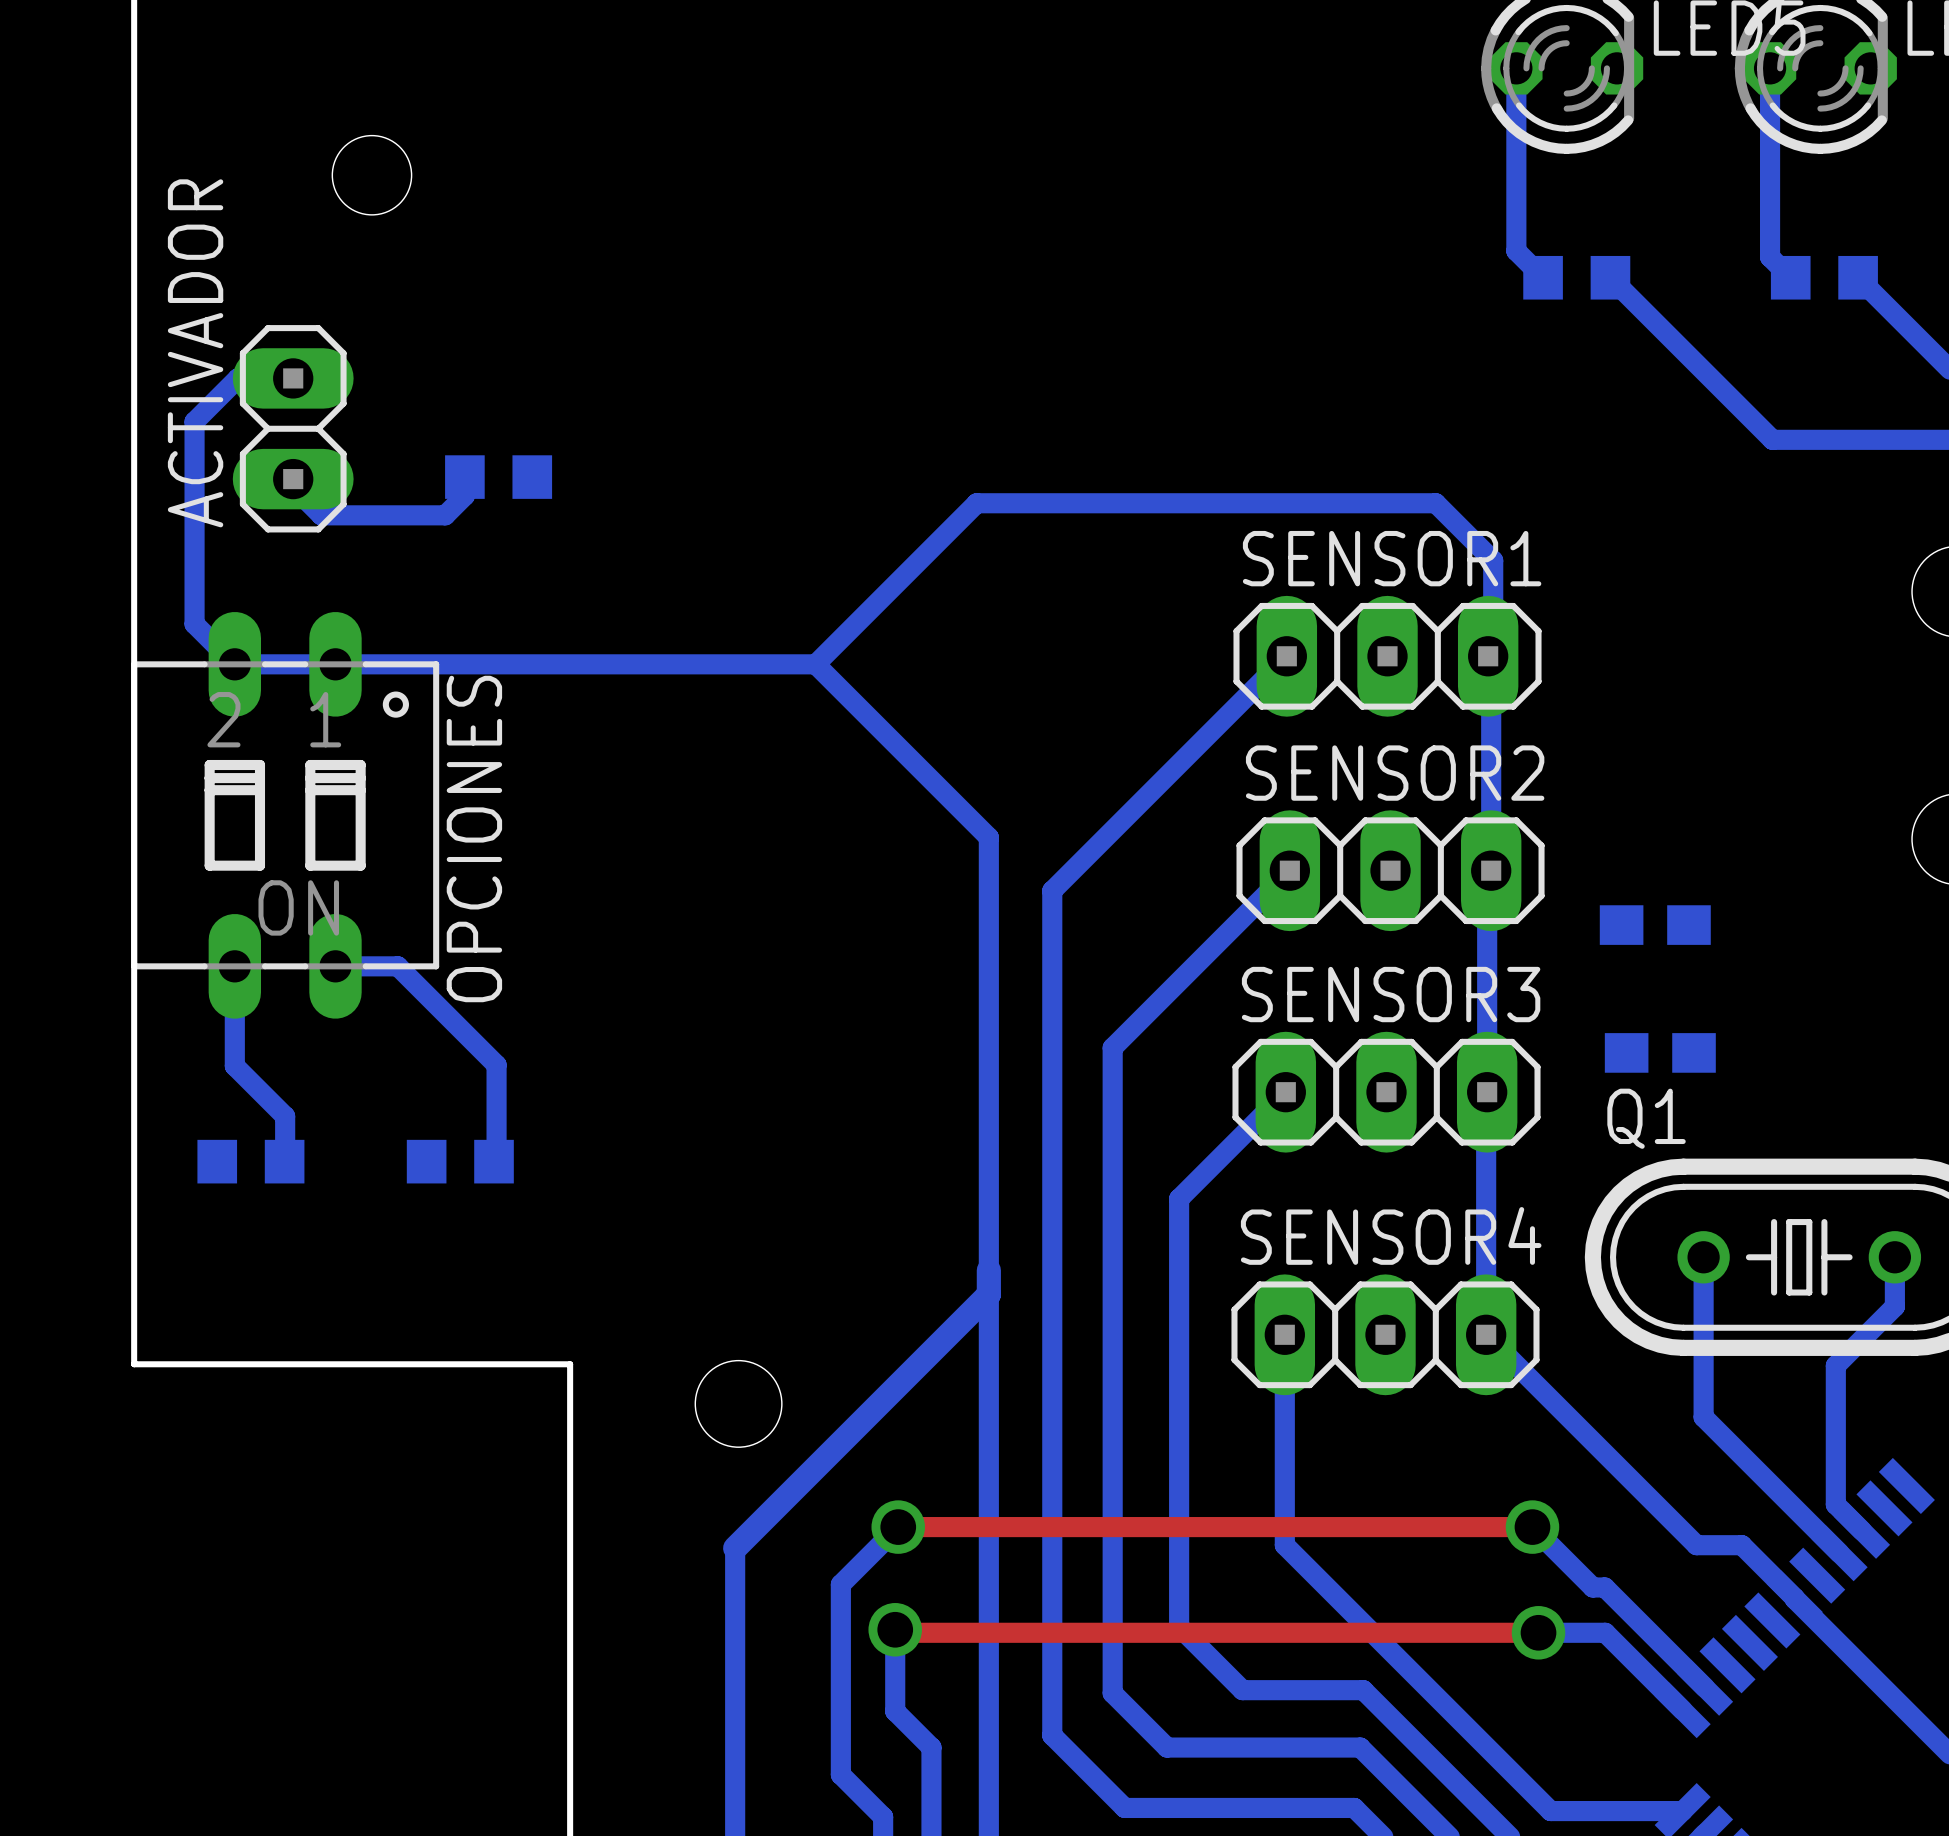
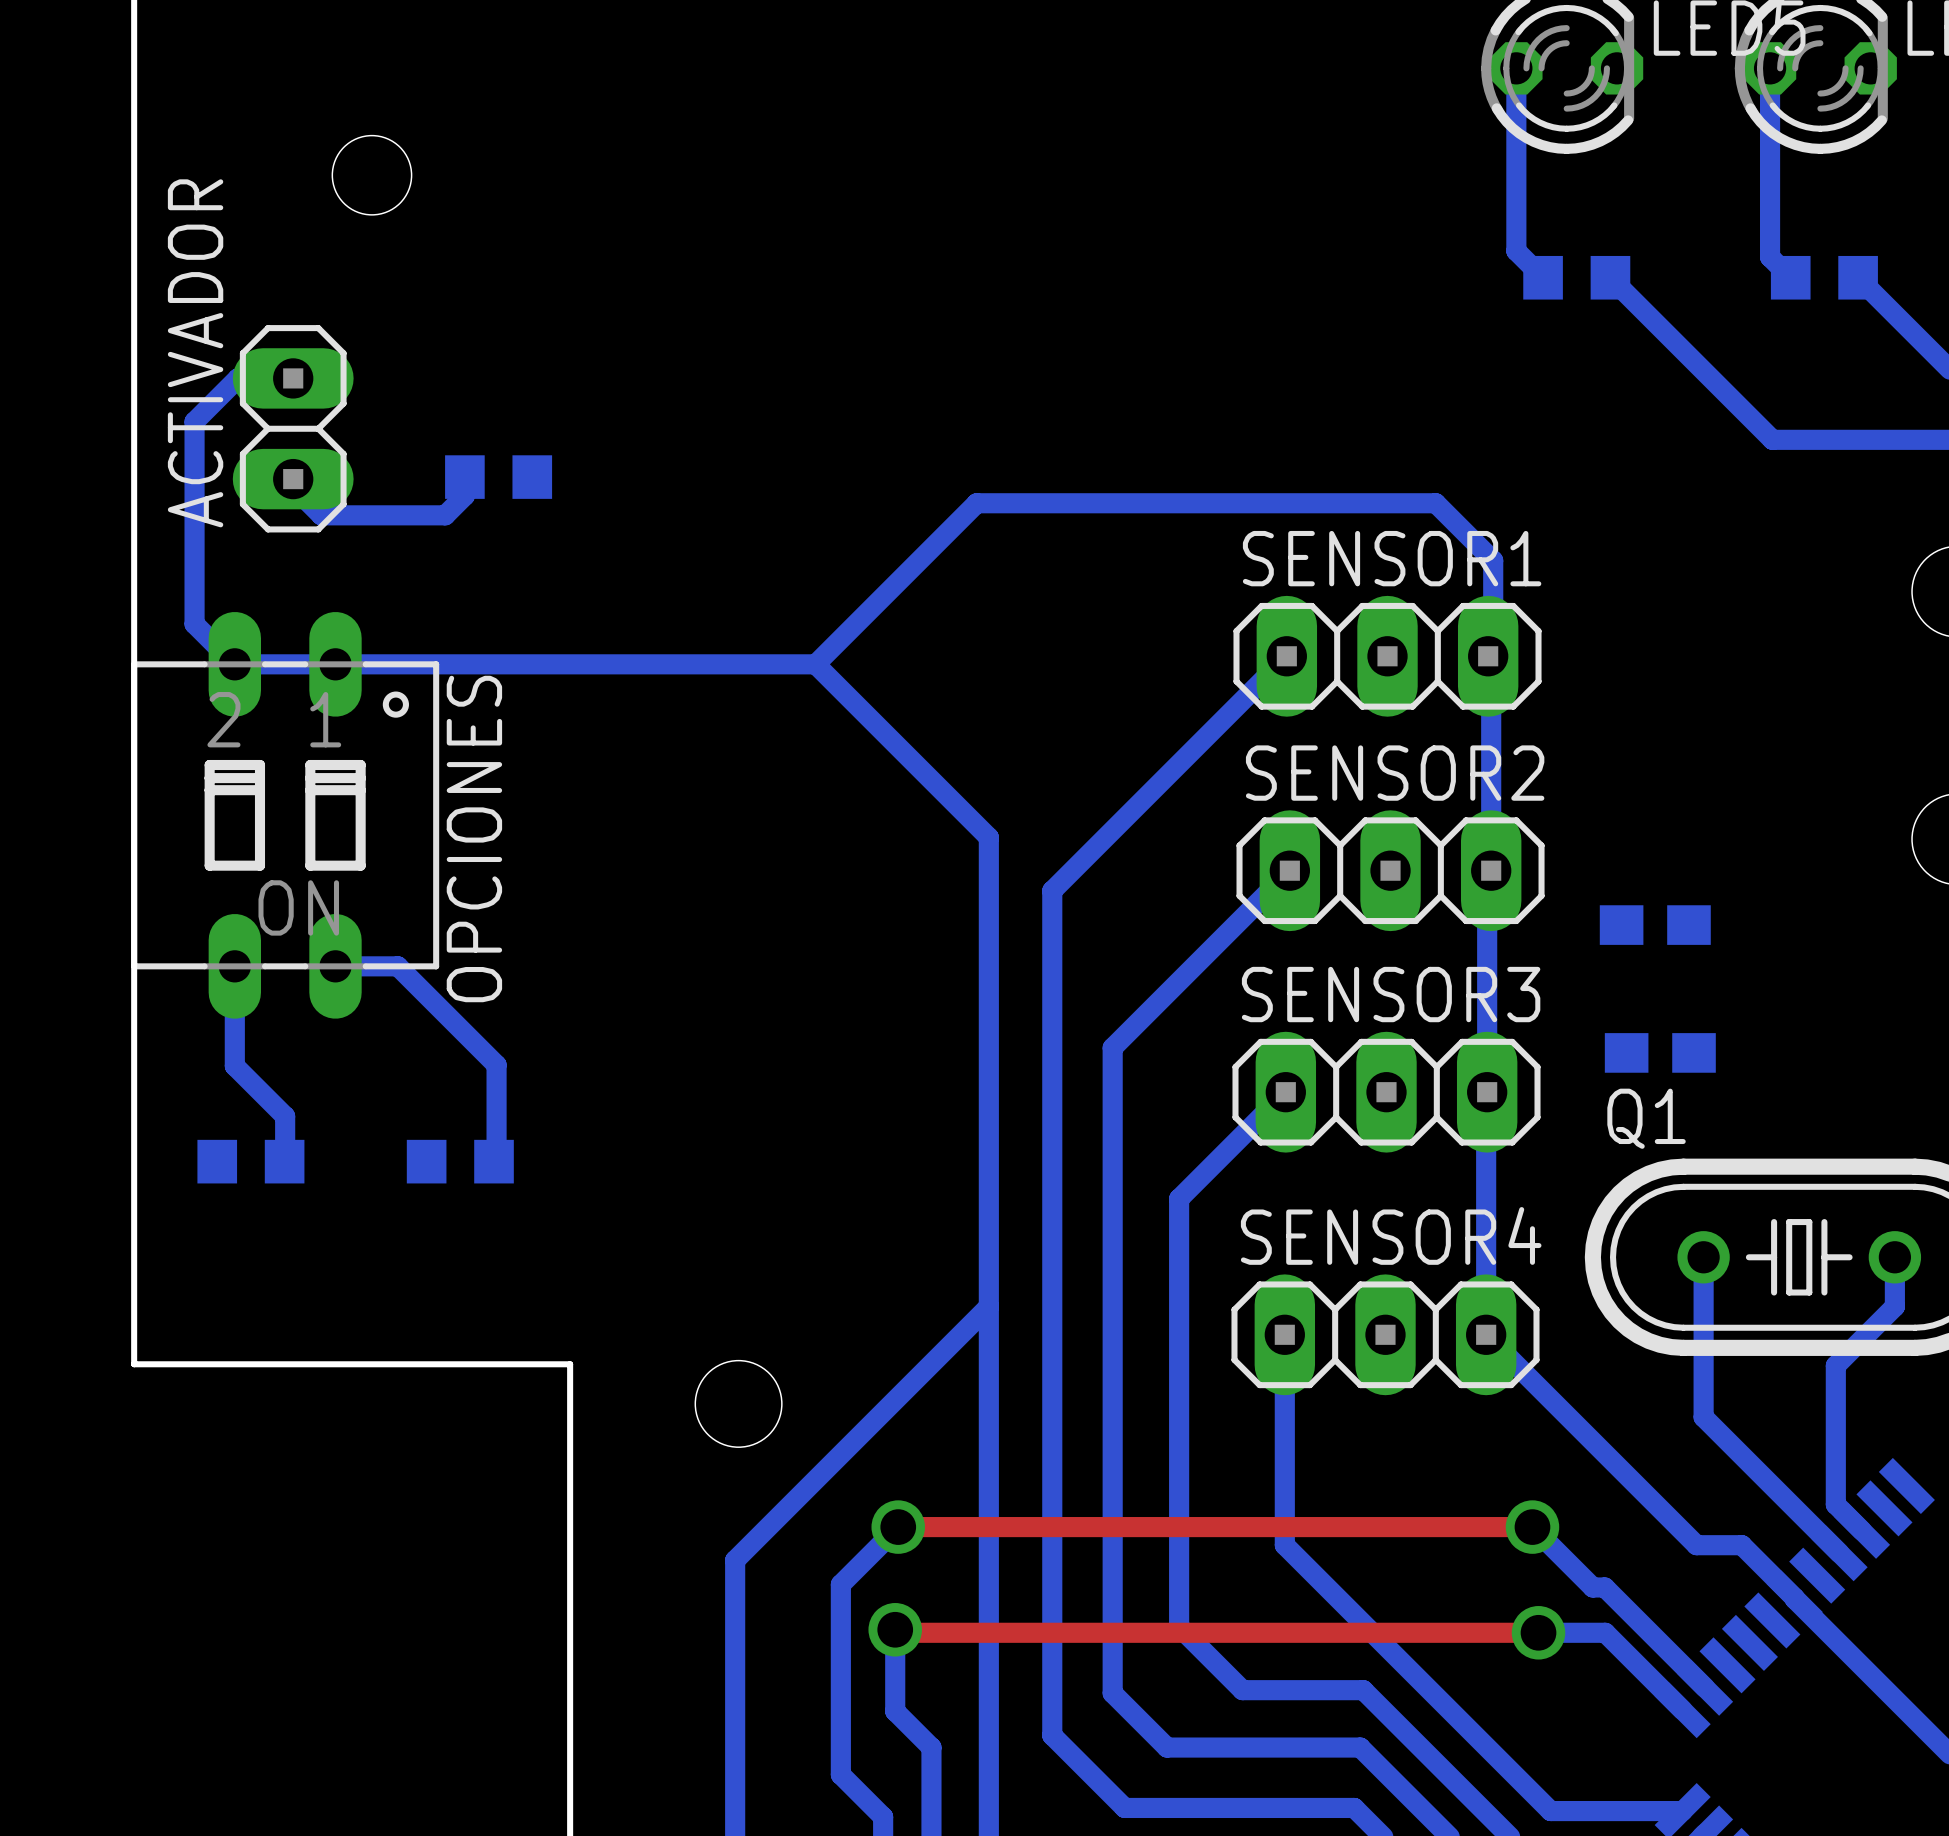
bottom track: (988, 1270) (988, 1294) (735, 1548) (735, 1560) -> (988, 1306) (735, 1560)

